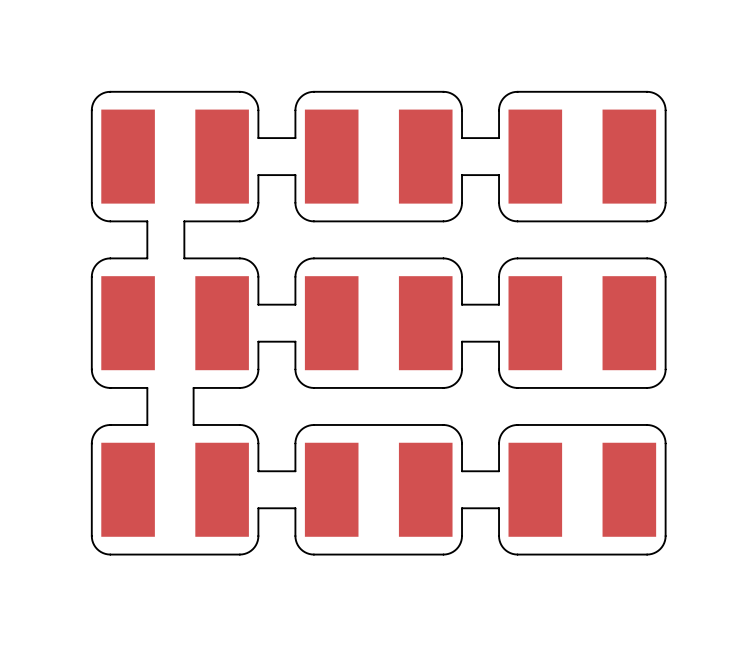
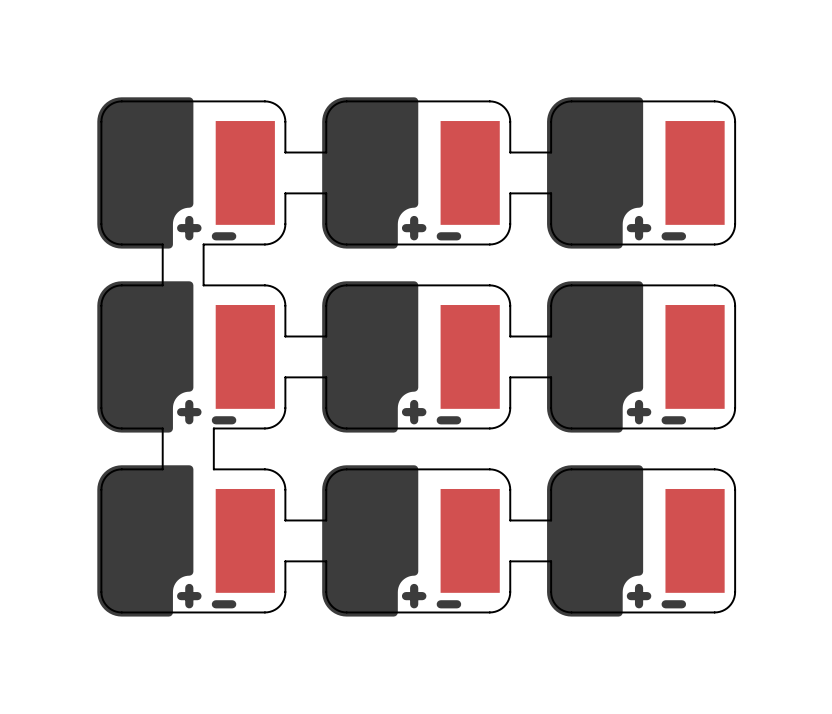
drawing: none -> [97, 97, 194, 617]
drawing: none -> [322, 97, 419, 617]
drawing: none -> [547, 97, 644, 617]
line: none -> (189, 219) (189, 236)
line: none -> (414, 219) (414, 236)
line: none -> (639, 219) (639, 236)
line: none -> (181, 228) (197, 228)
line: none -> (405, 228) (422, 228)
line: none -> (630, 228) (647, 228)
line: none -> (215, 236) (232, 236)
line: none -> (440, 236) (457, 236)
line: none -> (665, 236) (681, 236)
line: none -> (189, 403) (189, 420)
line: none -> (414, 403) (414, 420)
line: none -> (639, 403) (639, 420)
line: none -> (181, 412) (197, 412)
line: none -> (405, 412) (422, 412)
line: none -> (630, 412) (647, 412)
line: none -> (215, 420) (232, 420)
line: none -> (440, 420) (457, 420)
line: none -> (665, 420) (681, 420)
line: none -> (189, 587) (189, 604)
line: none -> (414, 587) (414, 604)
line: none -> (639, 587) (639, 604)
line: none -> (181, 596) (197, 596)
line: none -> (405, 596) (422, 596)
line: none -> (630, 596) (647, 596)
line: none -> (215, 604) (232, 604)
line: none -> (440, 604) (457, 604)
line: none -> (665, 604) (681, 604)

